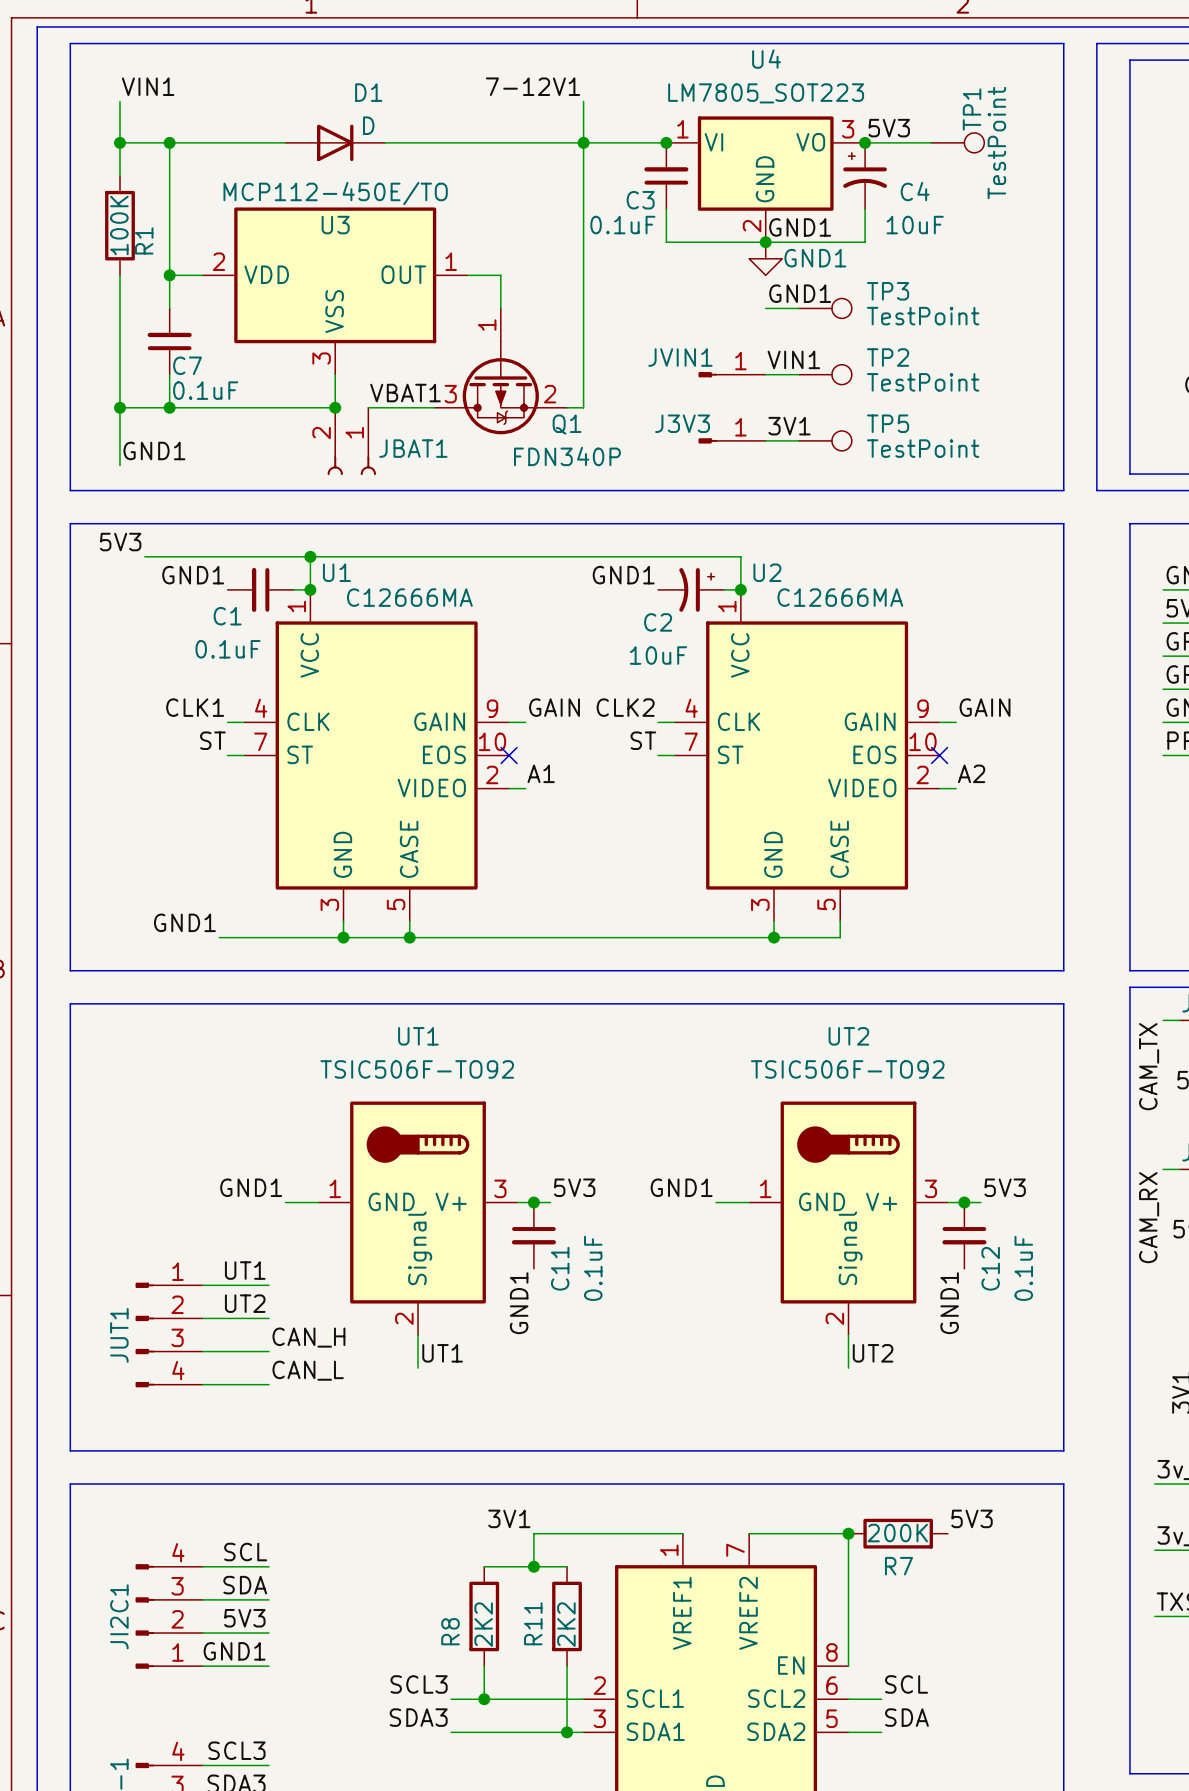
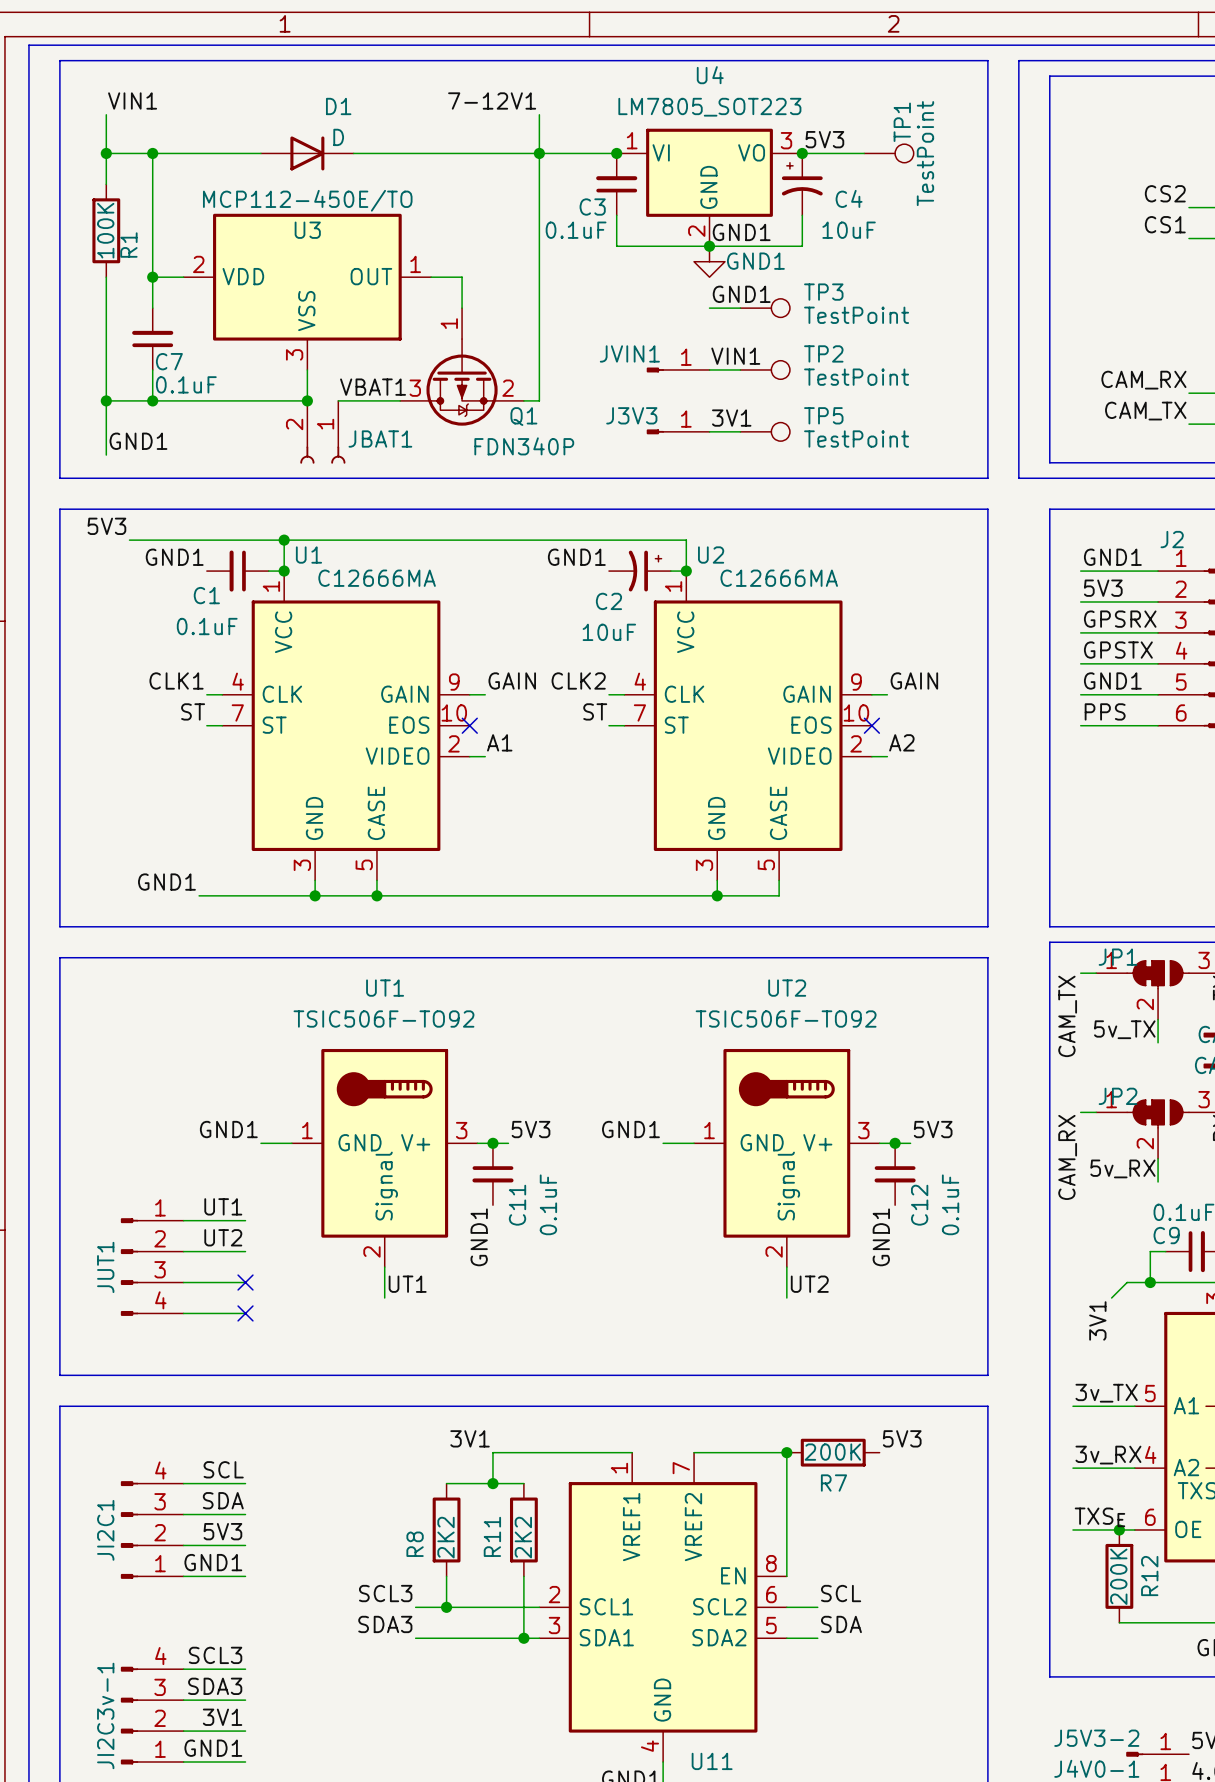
label: CAN_H (308, 1337) -> none
no-connect mark: none -> (245, 1282)
label: CAN_L (308, 1370) -> none
no-connect mark: none -> (245, 1313)

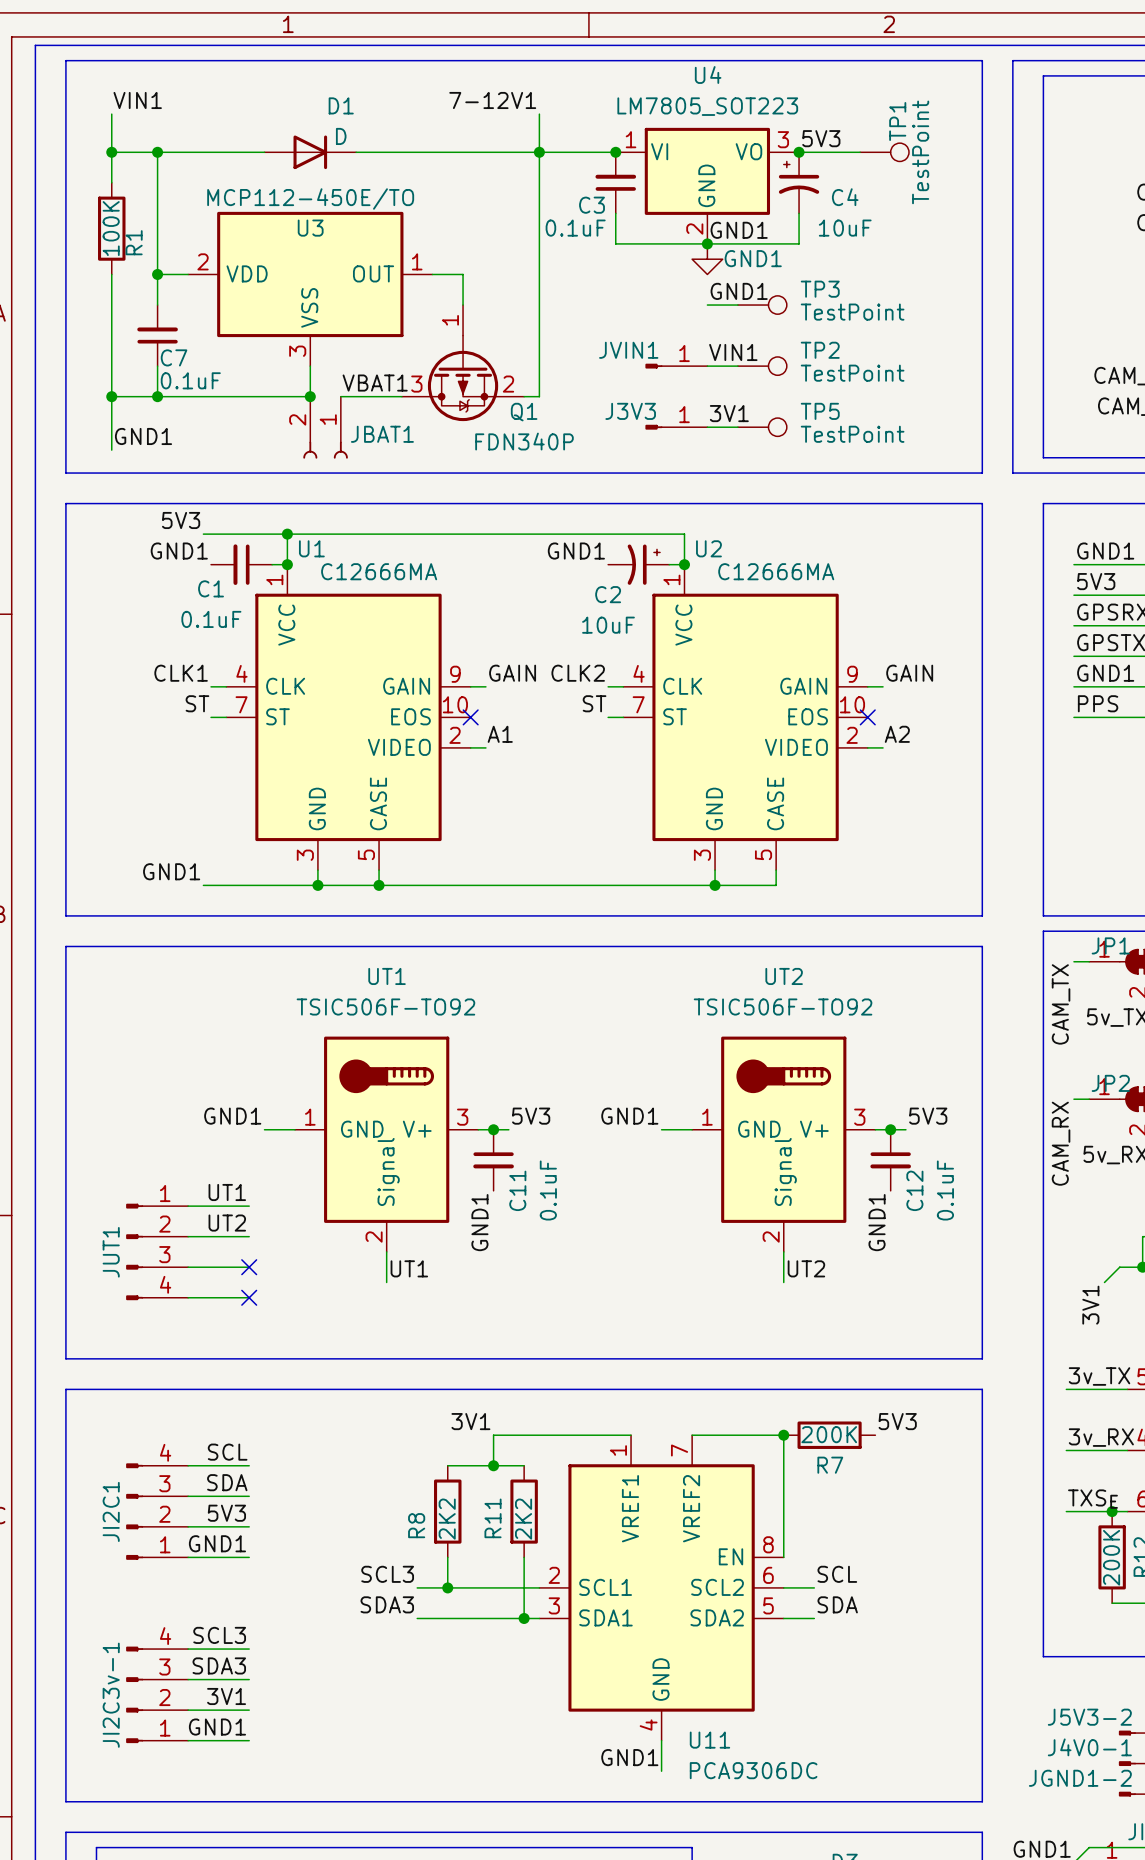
label position: 5V3 (106, 526) -> 5V3 (181, 520)
wire: (129, 540) (199, 540) -> none

